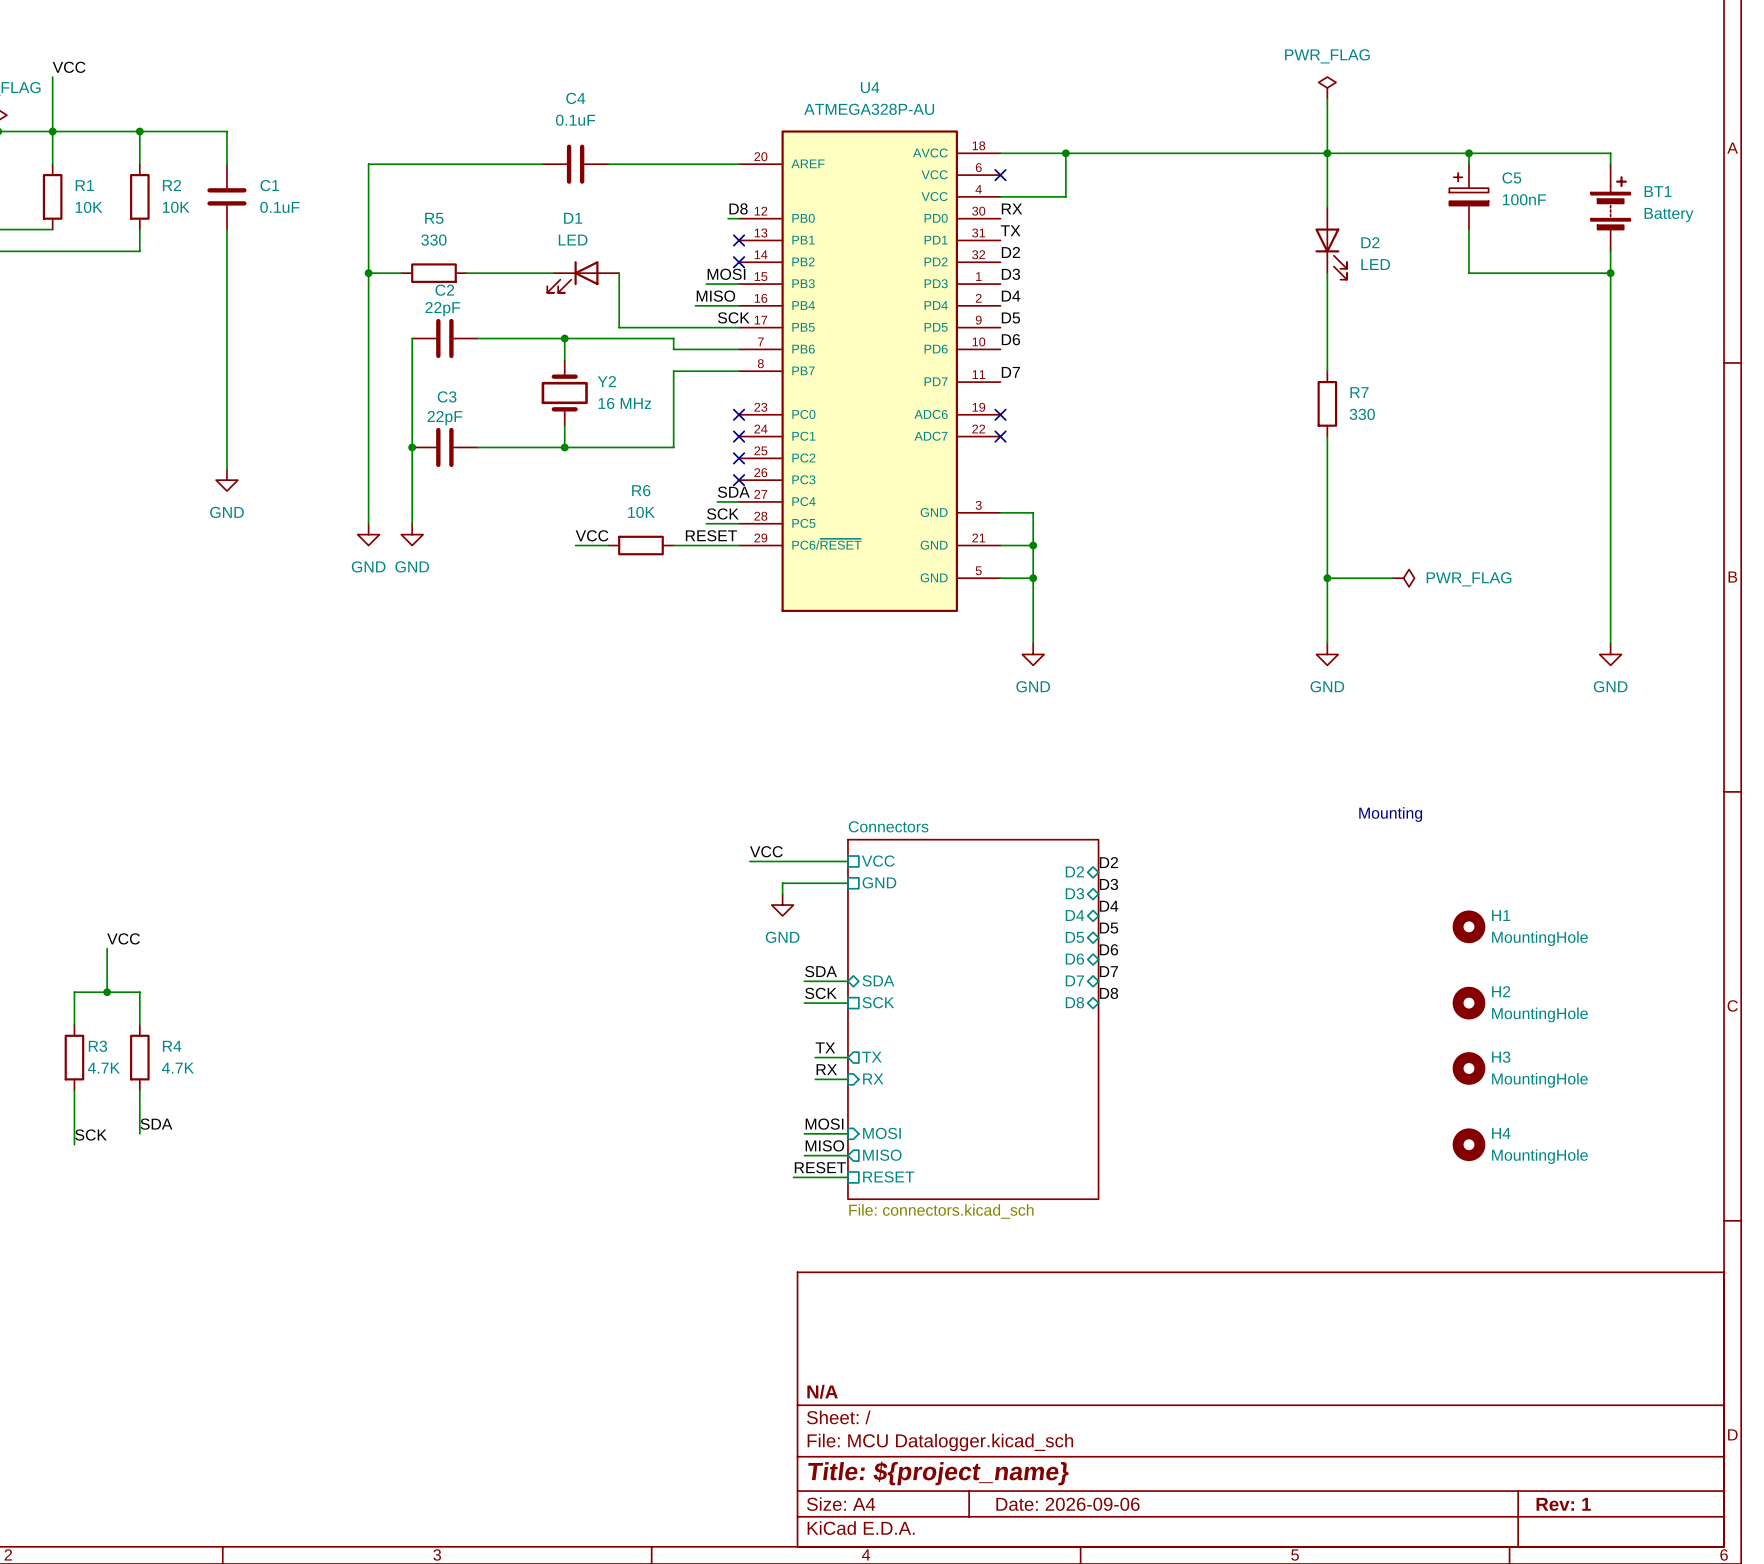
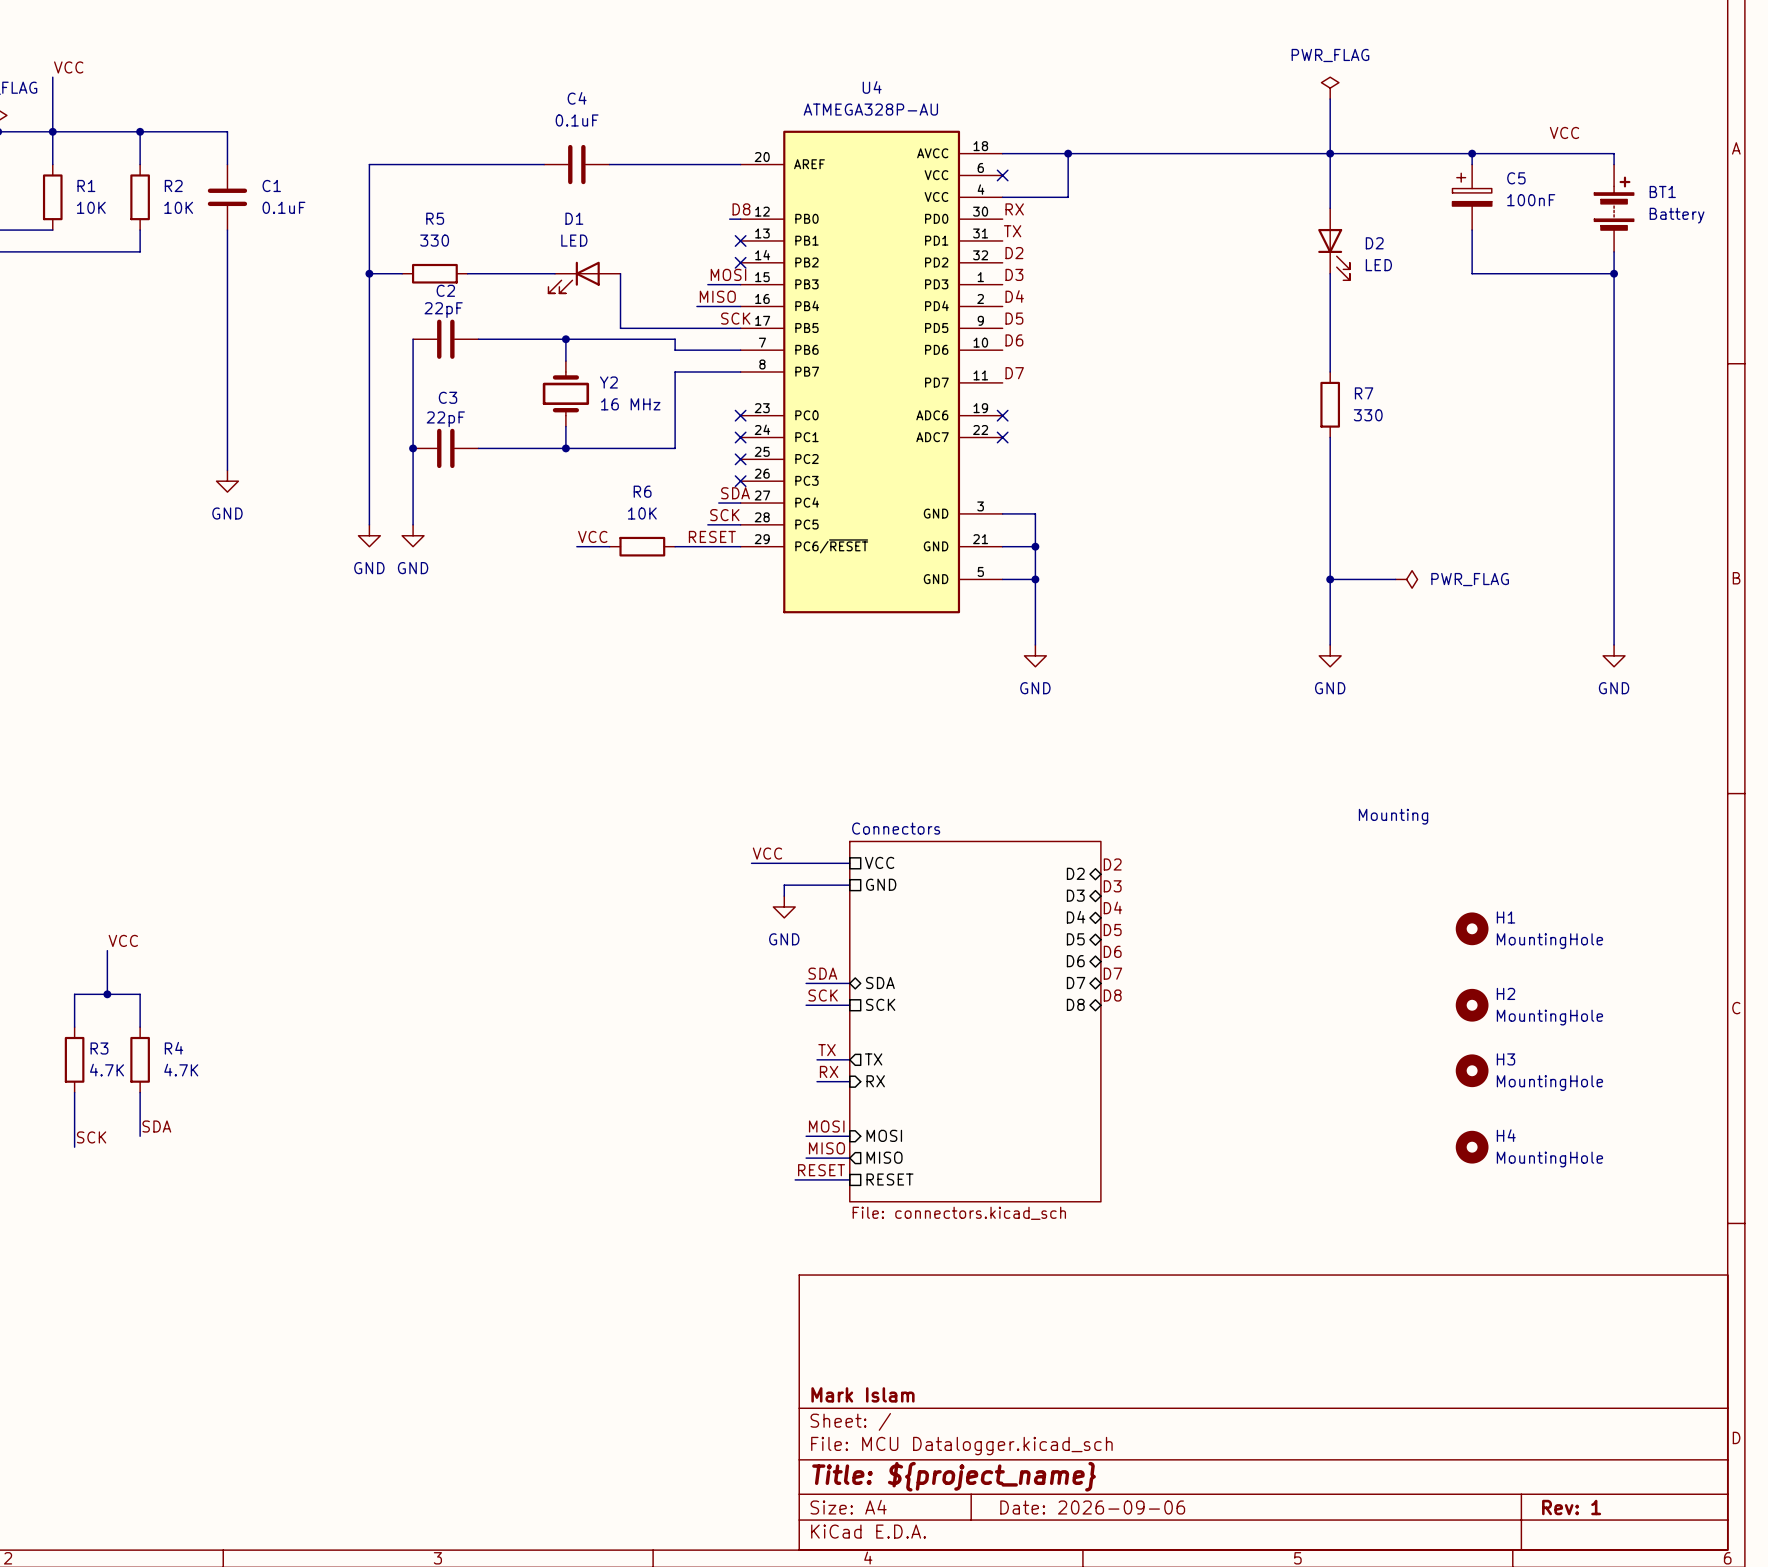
label: none -> VCC (1564, 132)
title block: N/A (822, 1391) -> Mark Islam (862, 1394)

